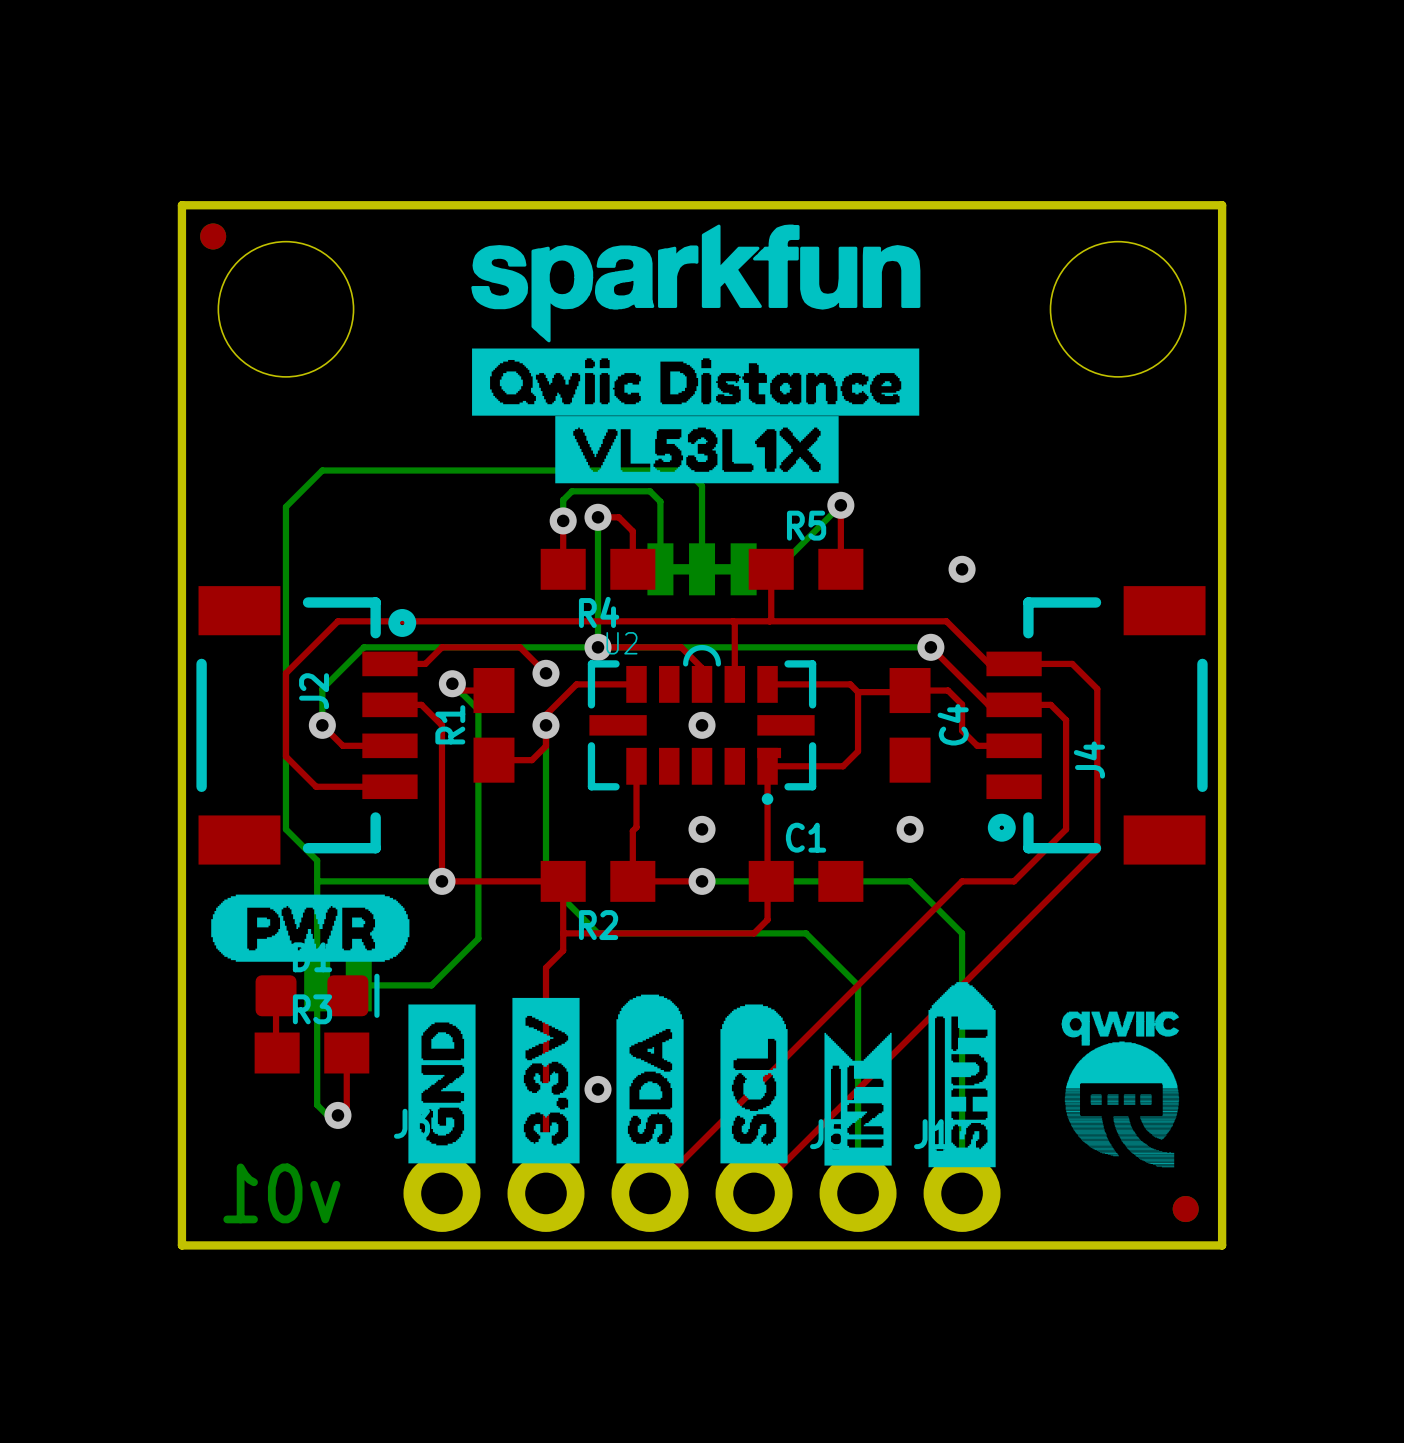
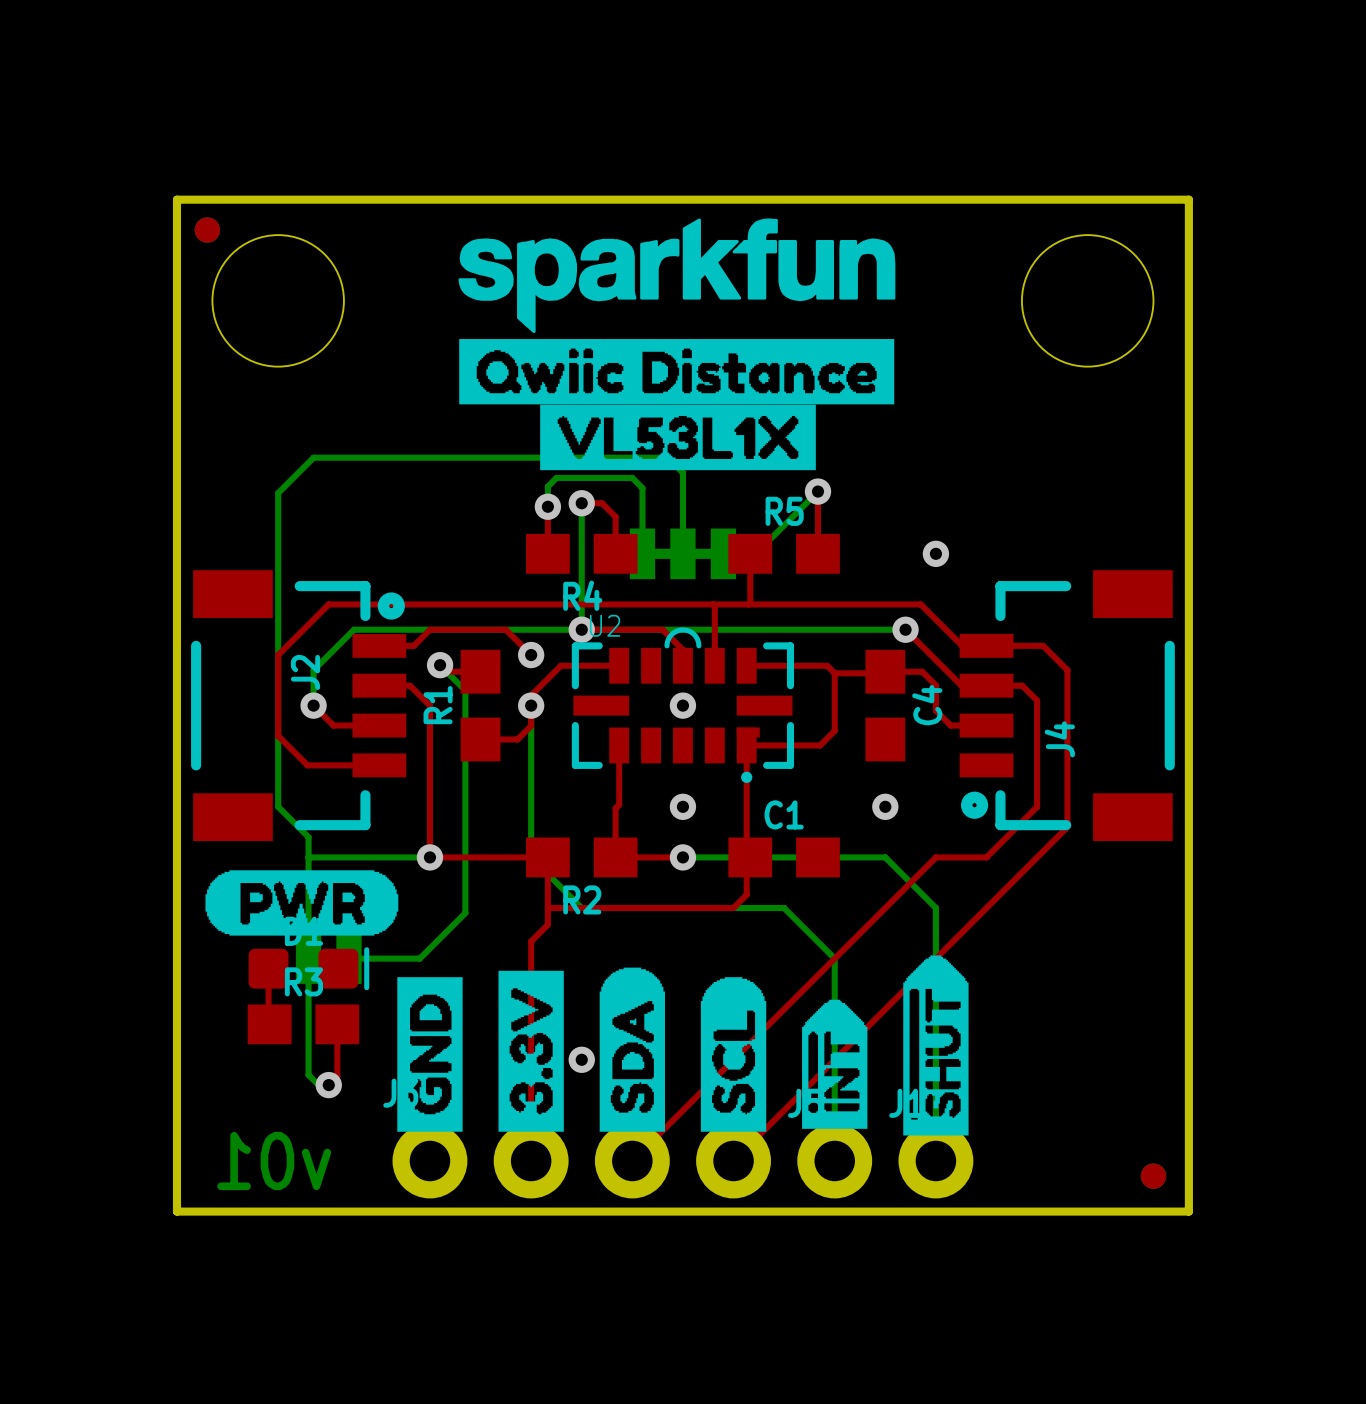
drawing: [1061, 1011, 1180, 1168] -> none
drawing shape: [824, 1032, 892, 1166] -> [802, 999, 868, 1129]

